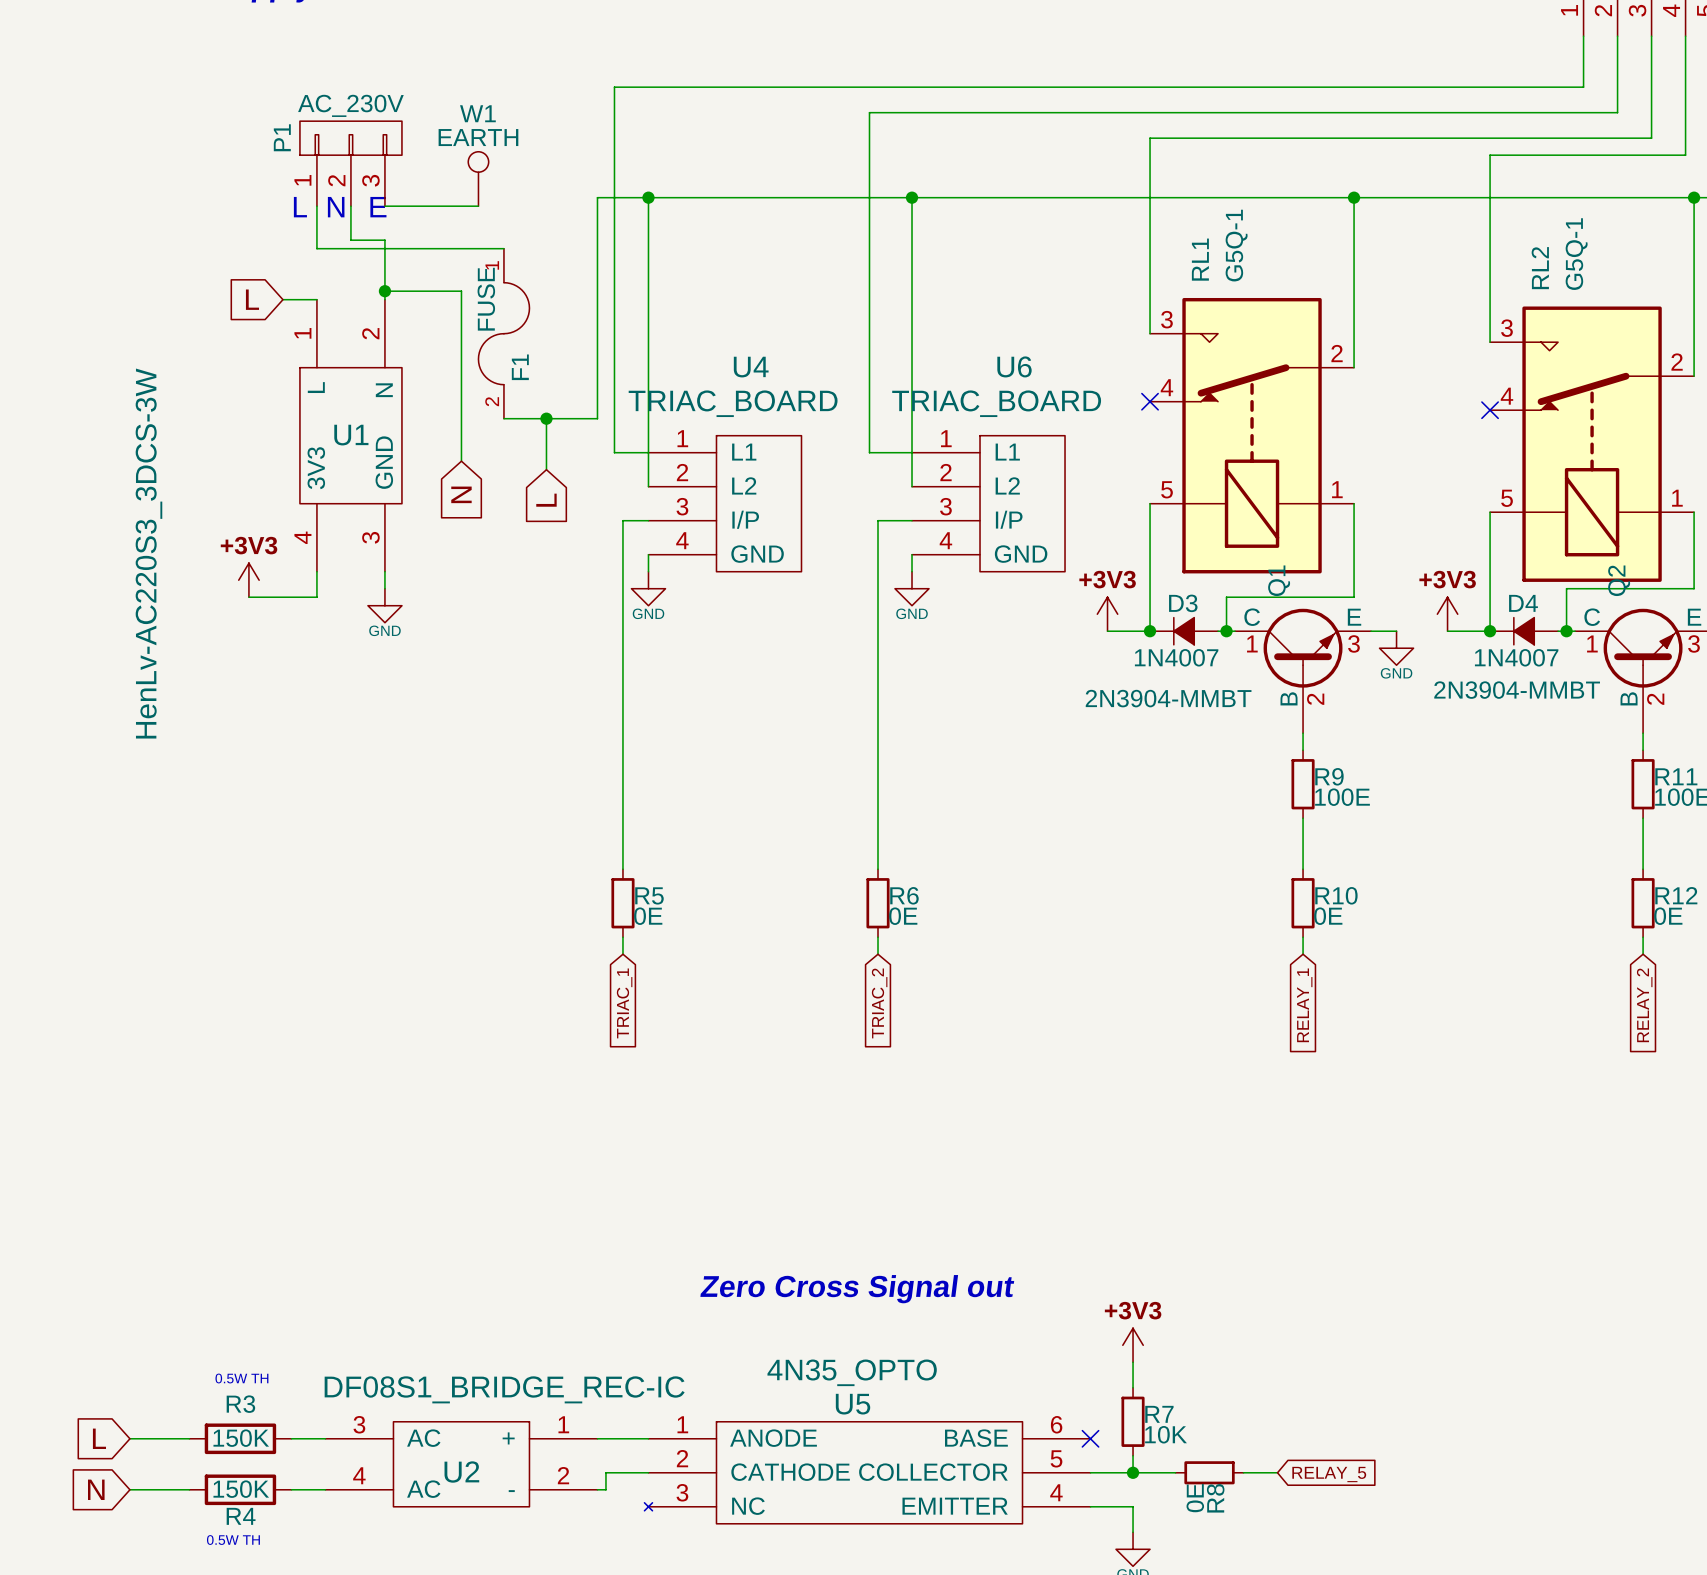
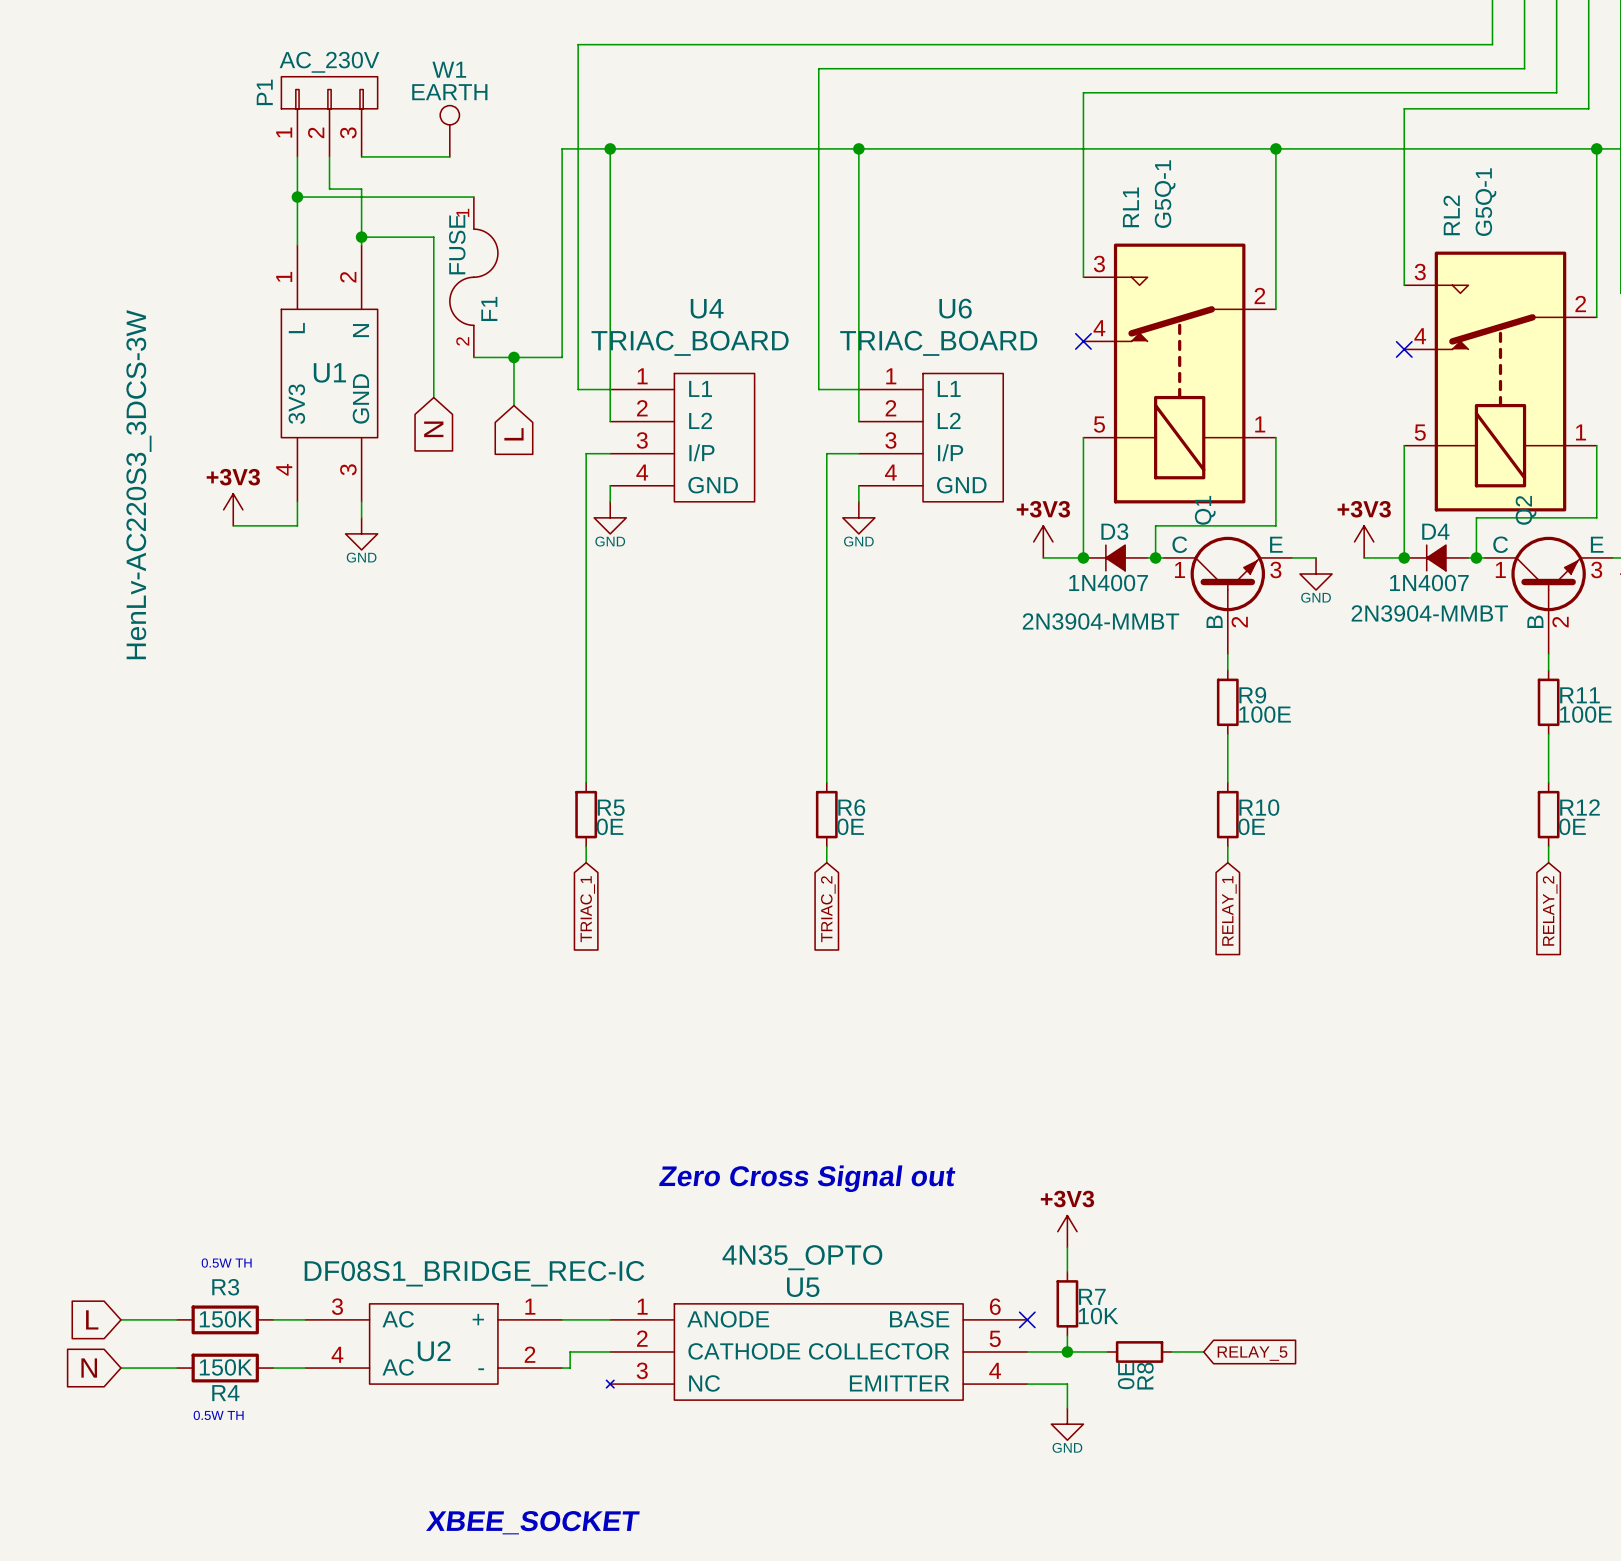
text: L (300, 207) -> none
text: N (336, 207) -> none
text: E (378, 207) -> none
junction: none -> (297, 197)
global label: L (252, 299) -> none
wire: (282, 299) (316, 299) -> (297, 197) (297, 245)

